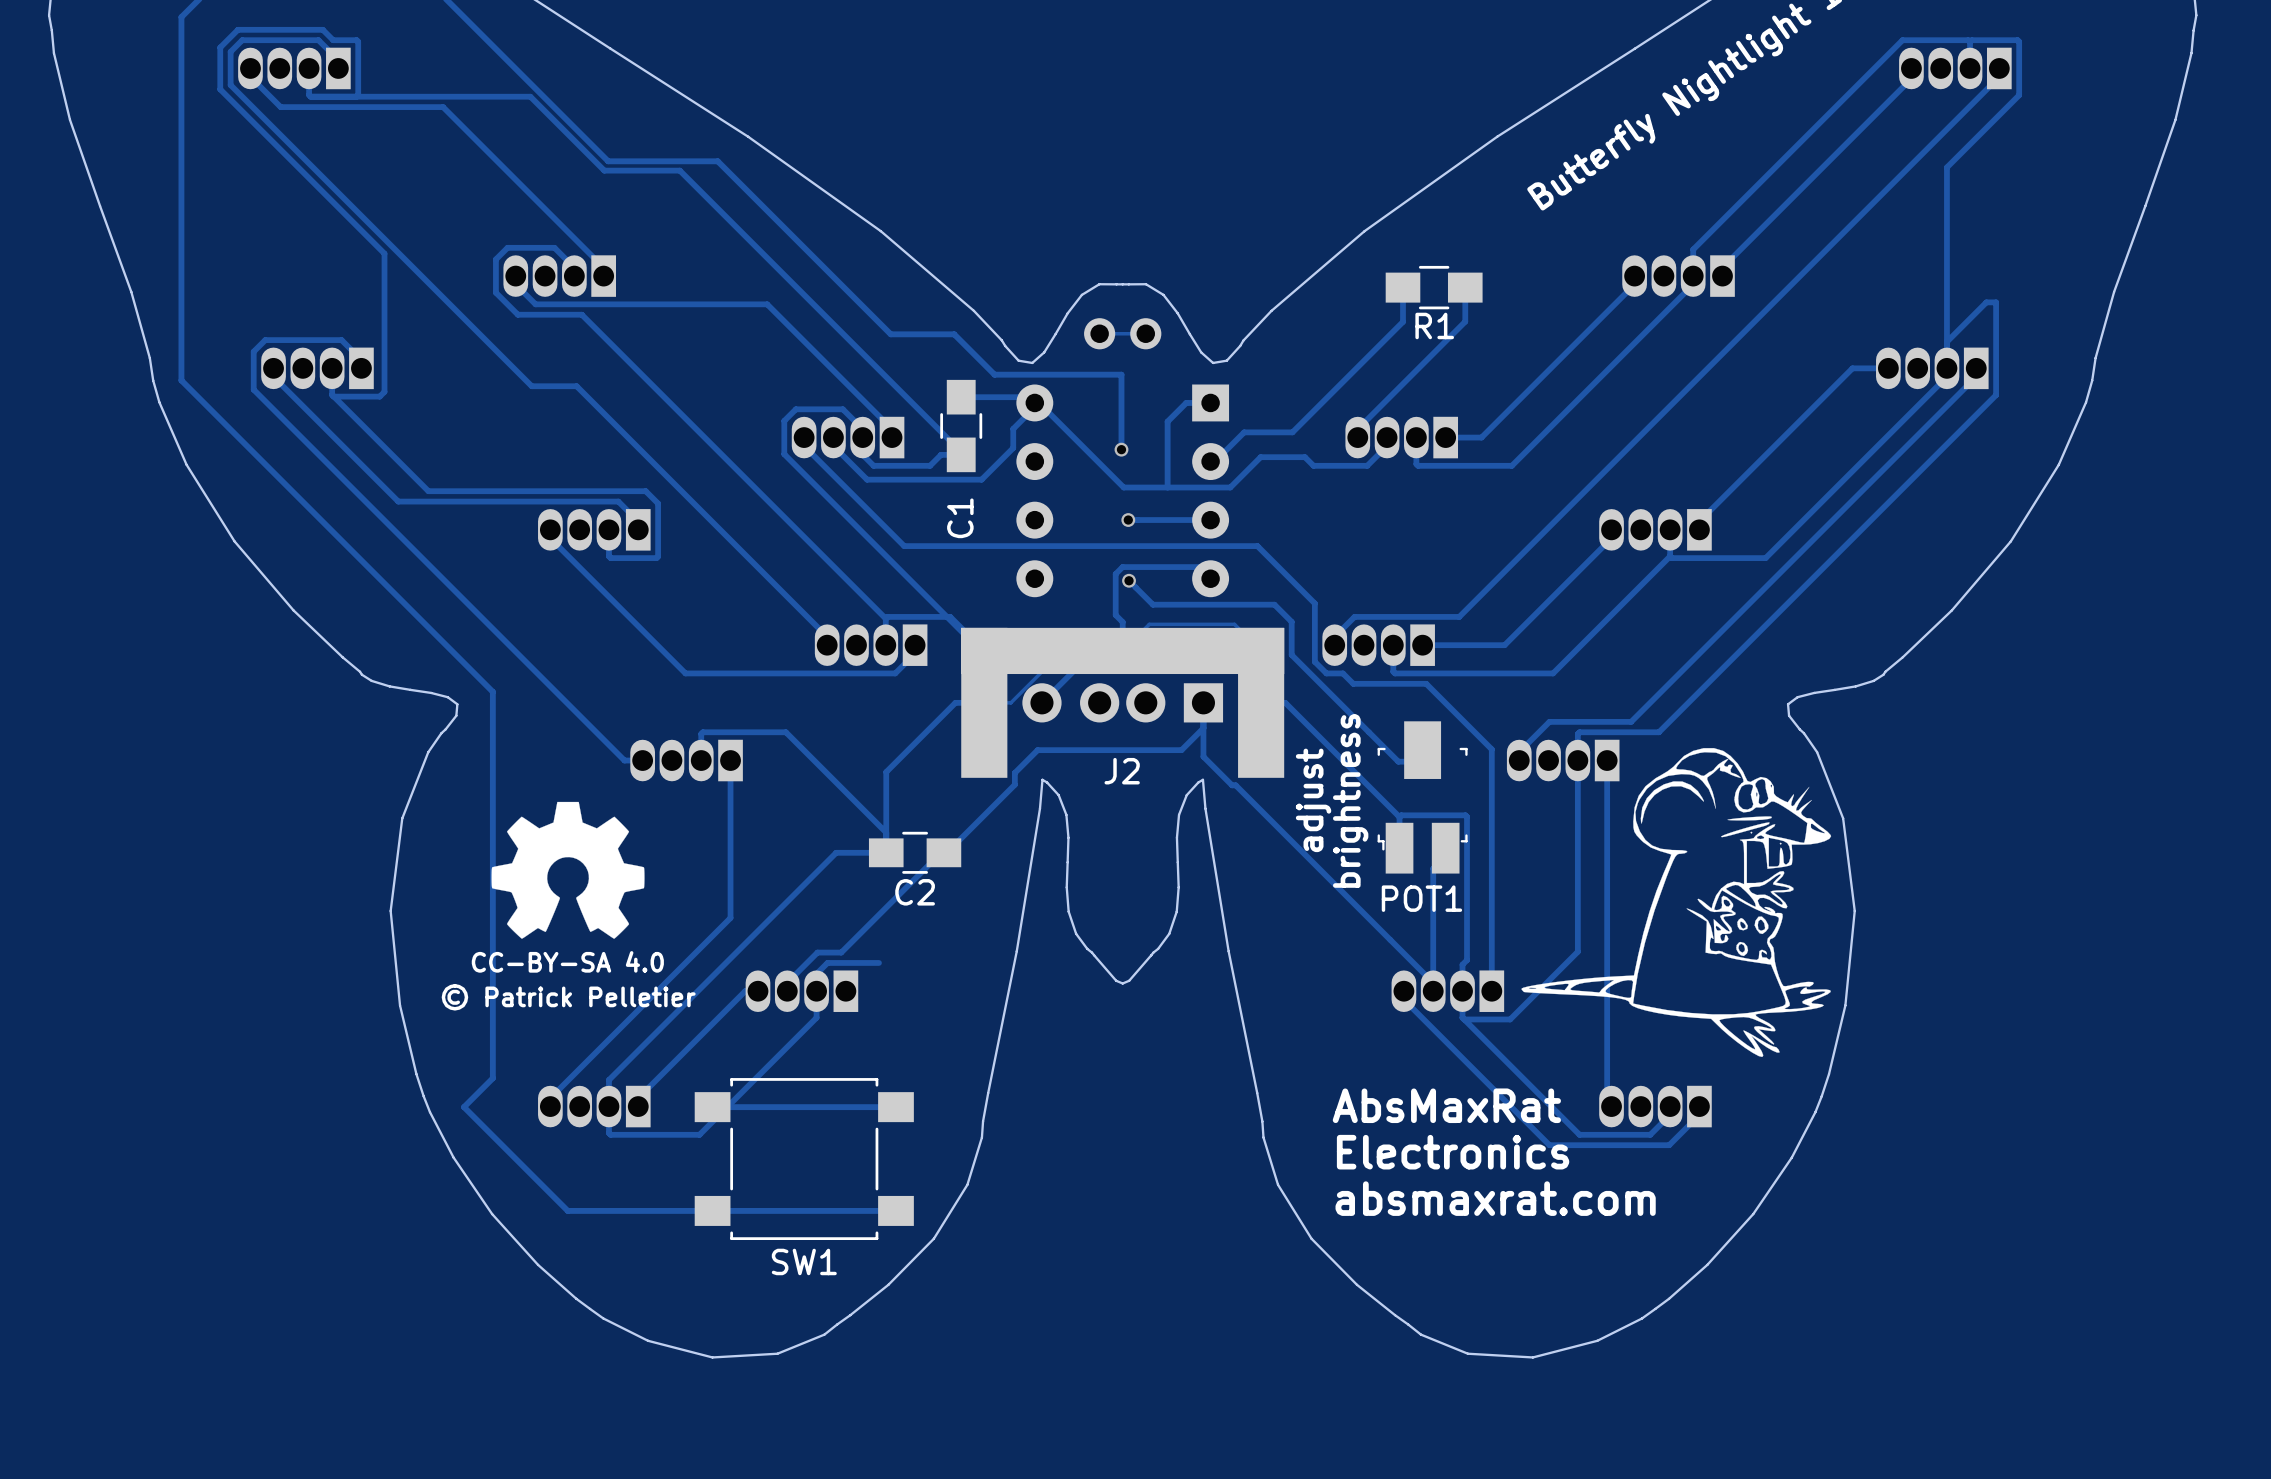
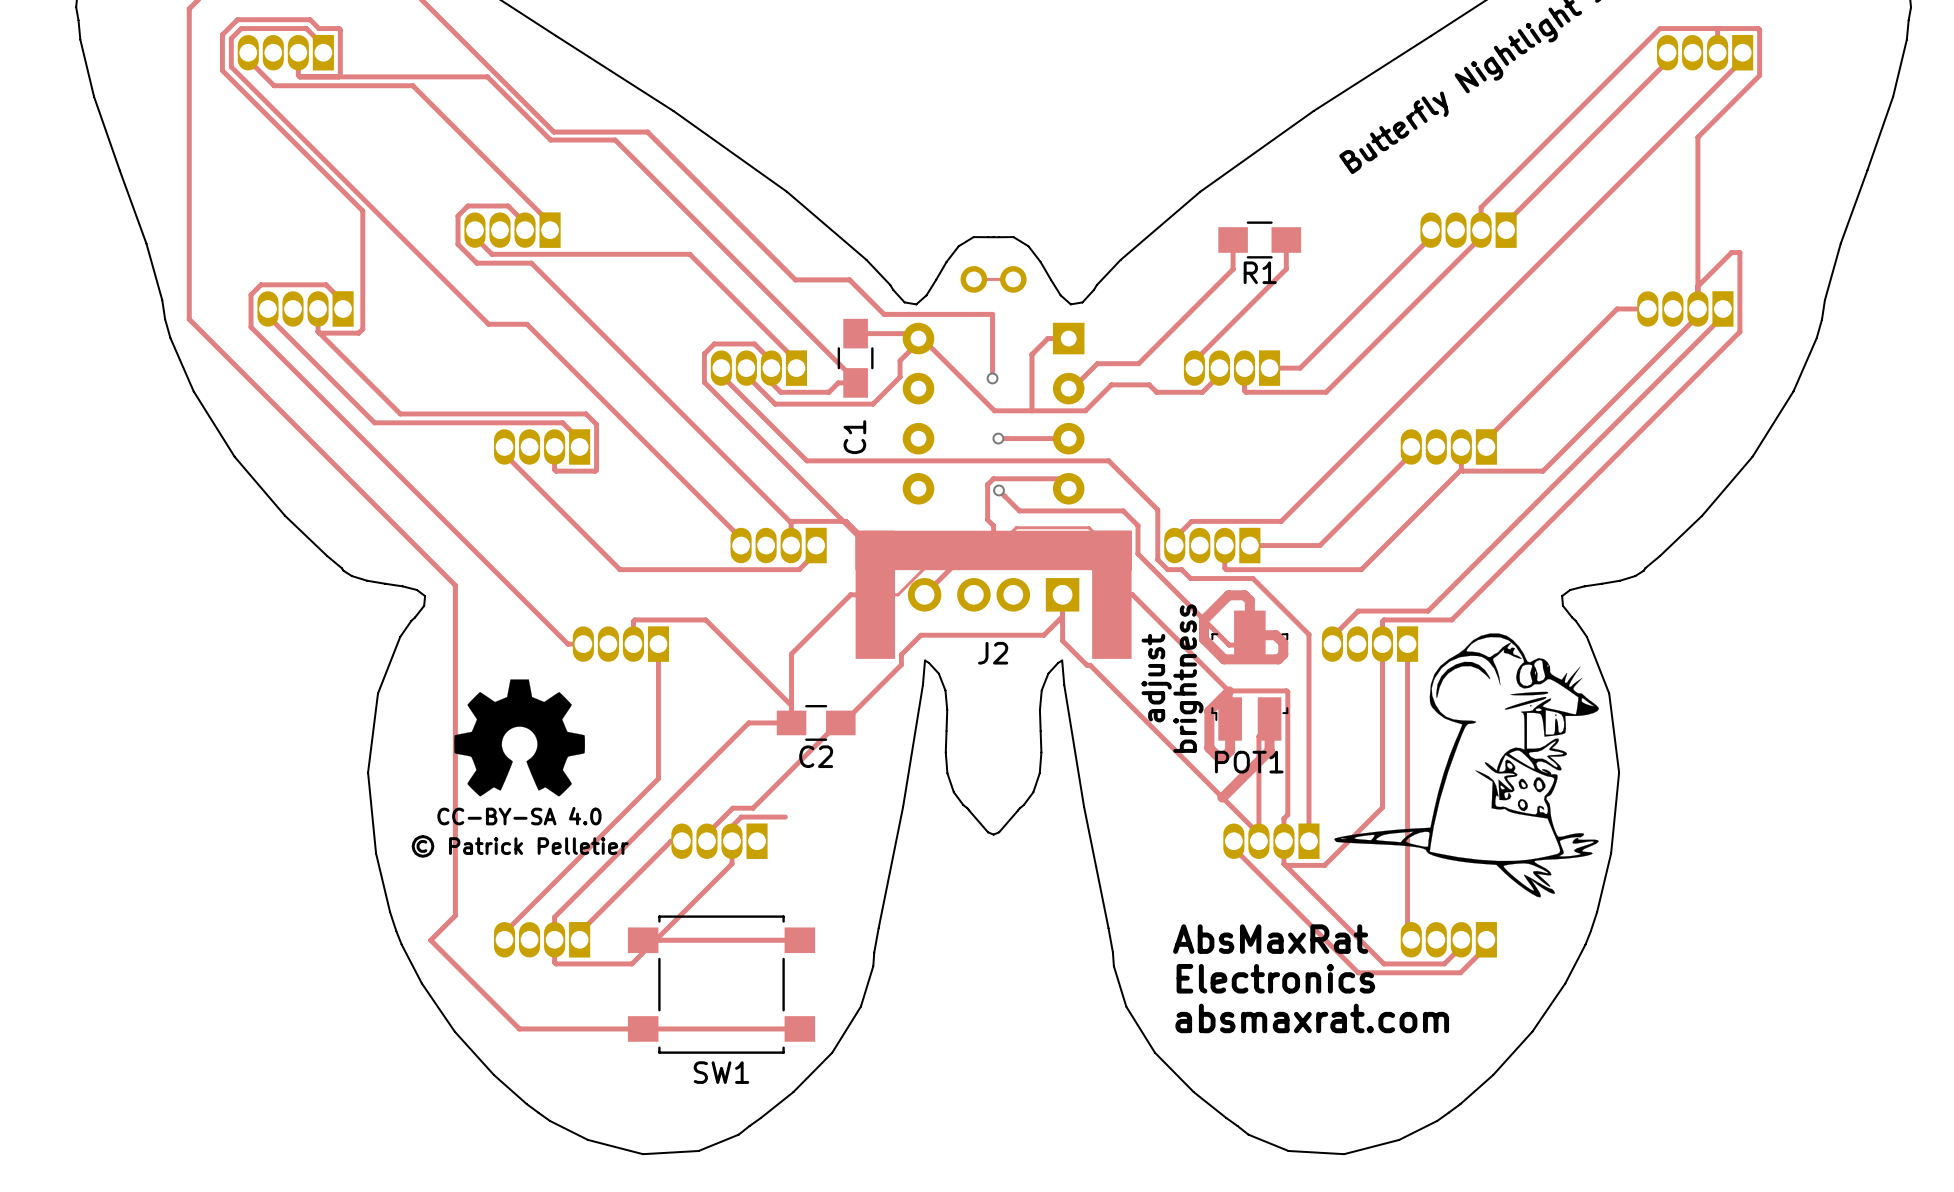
track: none -> (1228, 595) (1204, 619) (1204, 639) (1224, 659) (1278, 659) (1283, 654) (1283, 642) (1275, 635) (1249, 635) (1249, 600) (1244, 595) (1228, 595)
track: none -> (1229, 691) (1209, 711) (1209, 748) (1219, 757) (1222, 757) (1230, 750) (1230, 719)
track: none -> (1269, 719) (1269, 750) (1222, 797)

